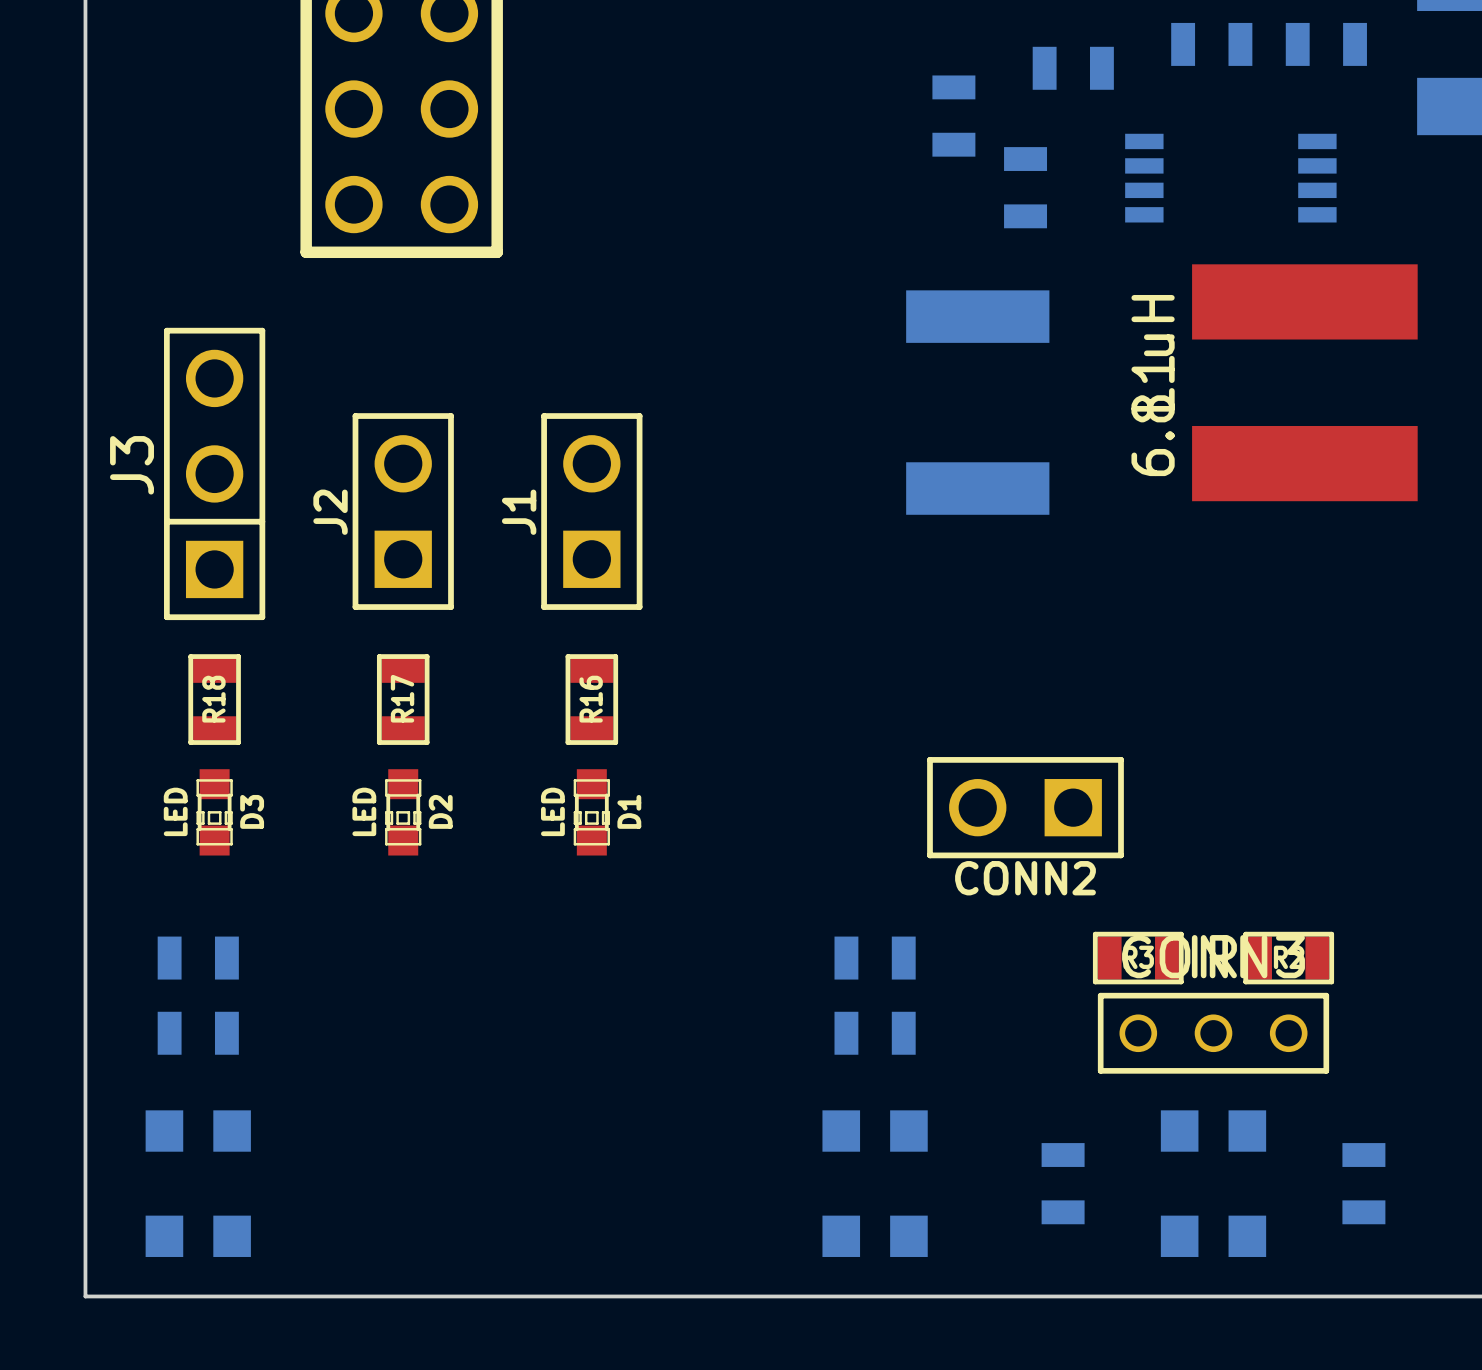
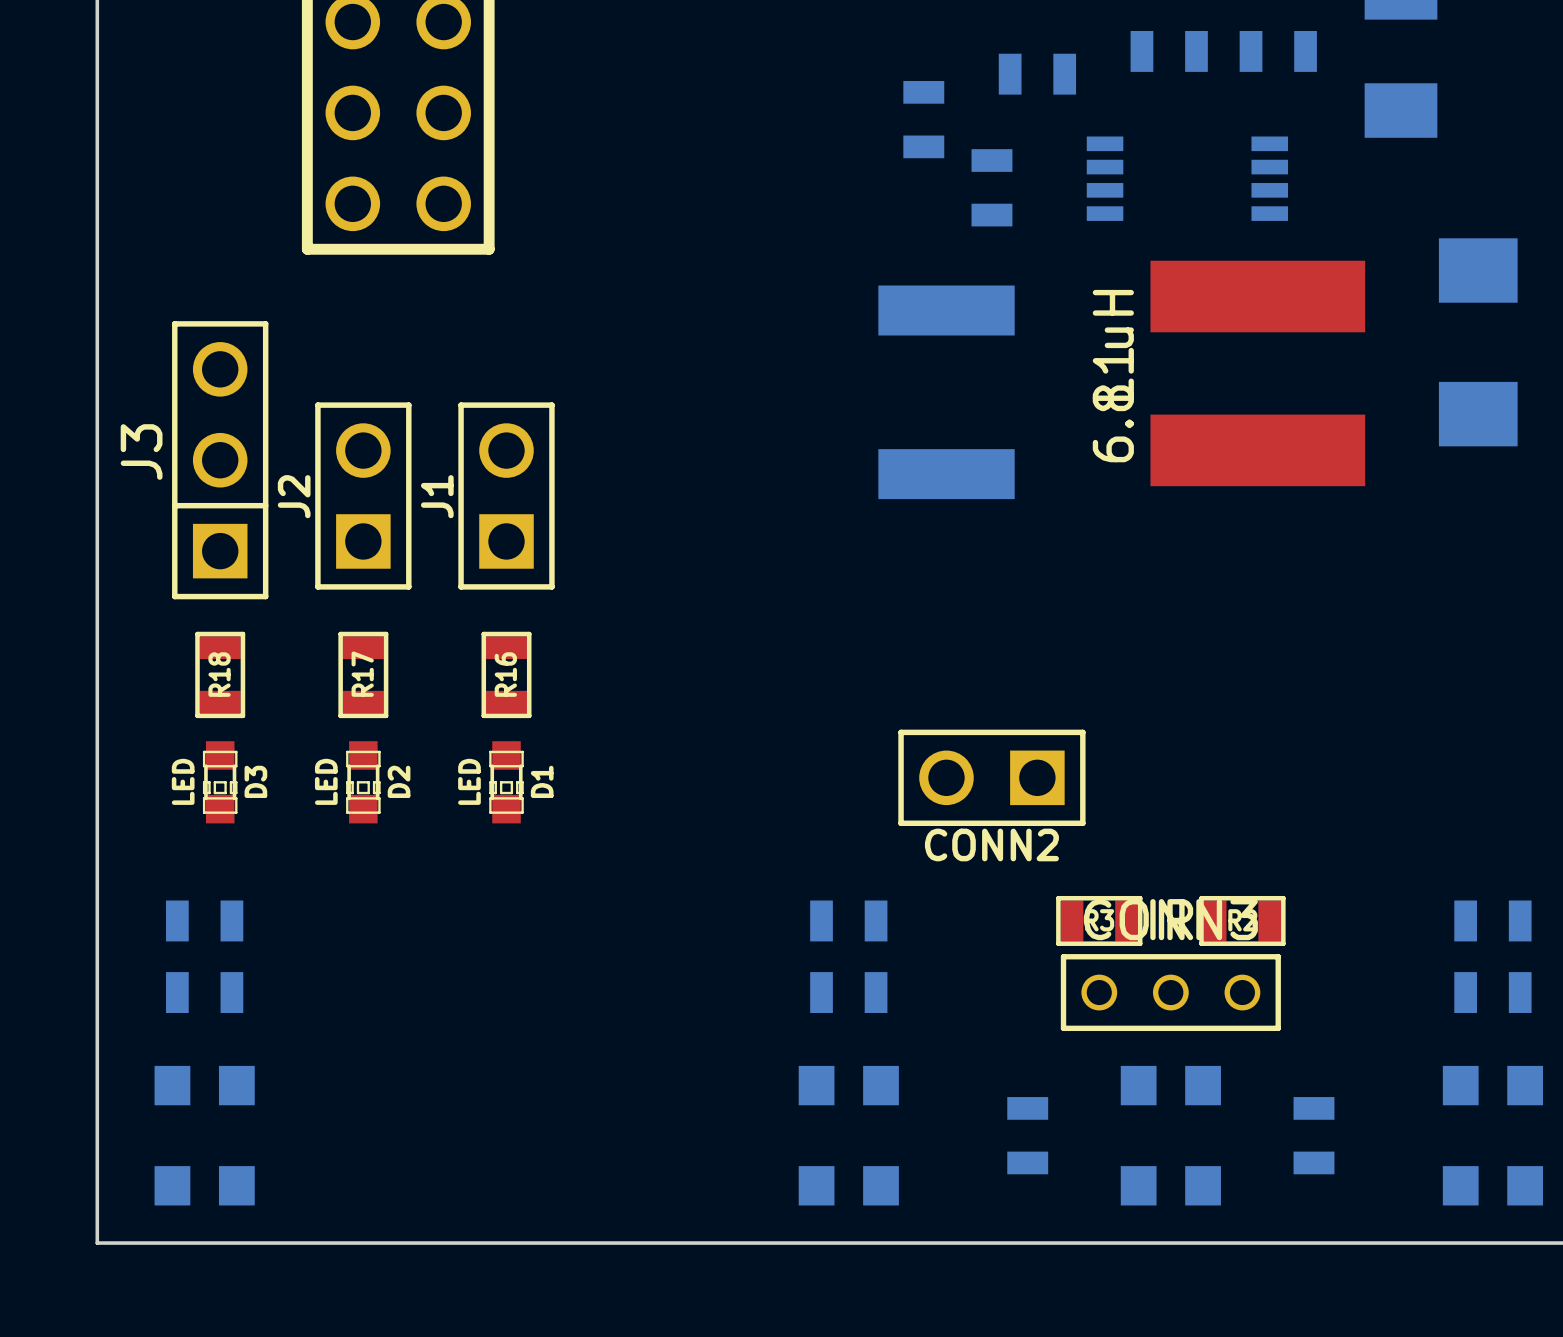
J2 position: (403, 511) -> (363, 496)
J1 position: (591, 511) -> (506, 496)
R17 position: (403, 699) -> (363, 674)
R16 position: (591, 699) -> (506, 674)
D2 position: (403, 812) -> (363, 782)
D1 position: (591, 812) -> (506, 782)

